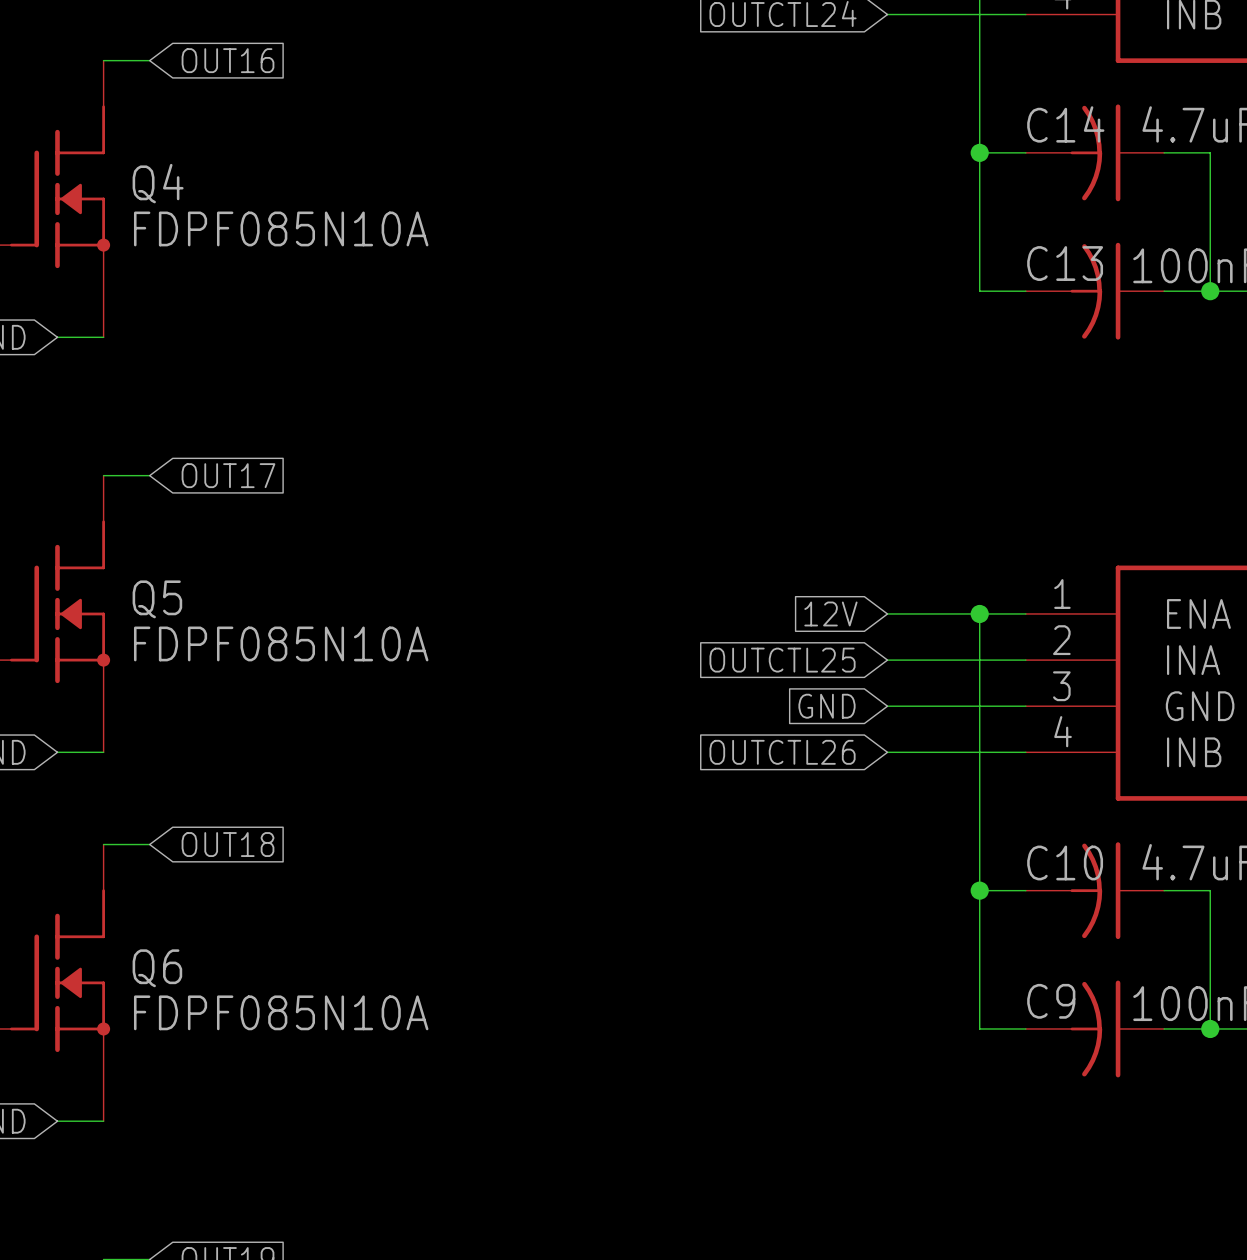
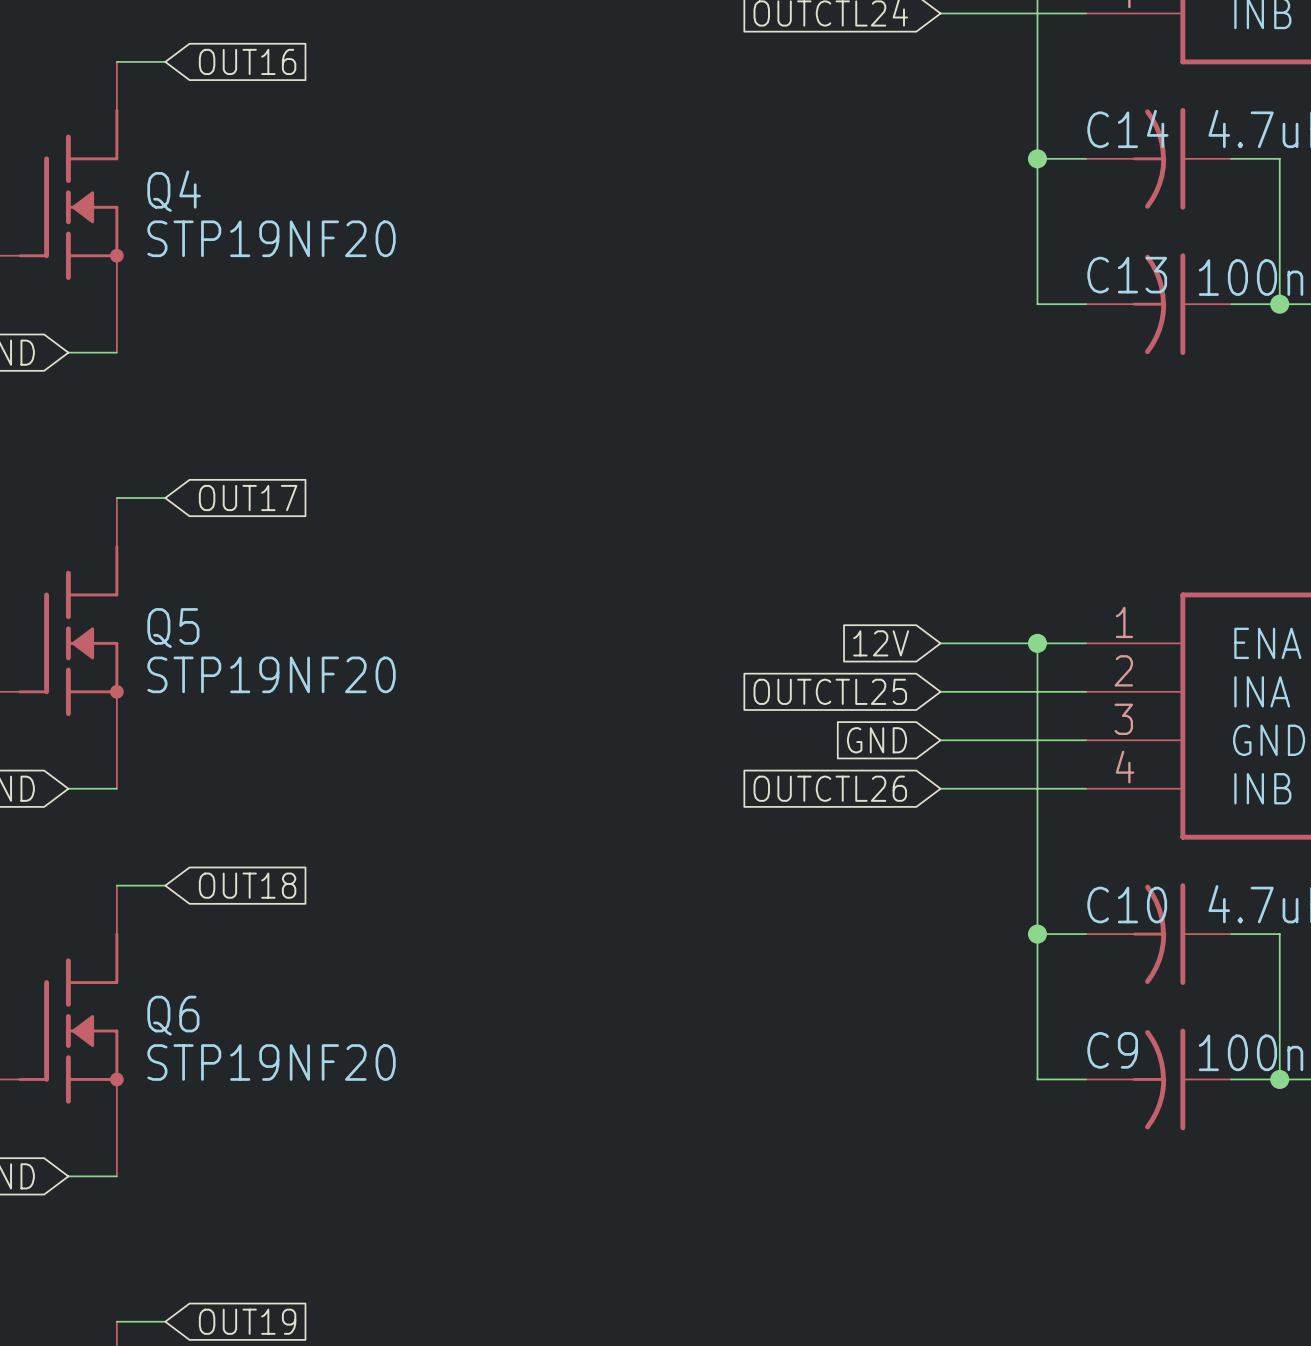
Q4 value: FDPF085N10A (281, 228) -> STP19NF20 (271, 238)
Q5 value: FDPF085N10A (281, 643) -> STP19NF20 (271, 674)
Q6 value: FDPF085N10A (281, 1012) -> STP19NF20 (271, 1062)

